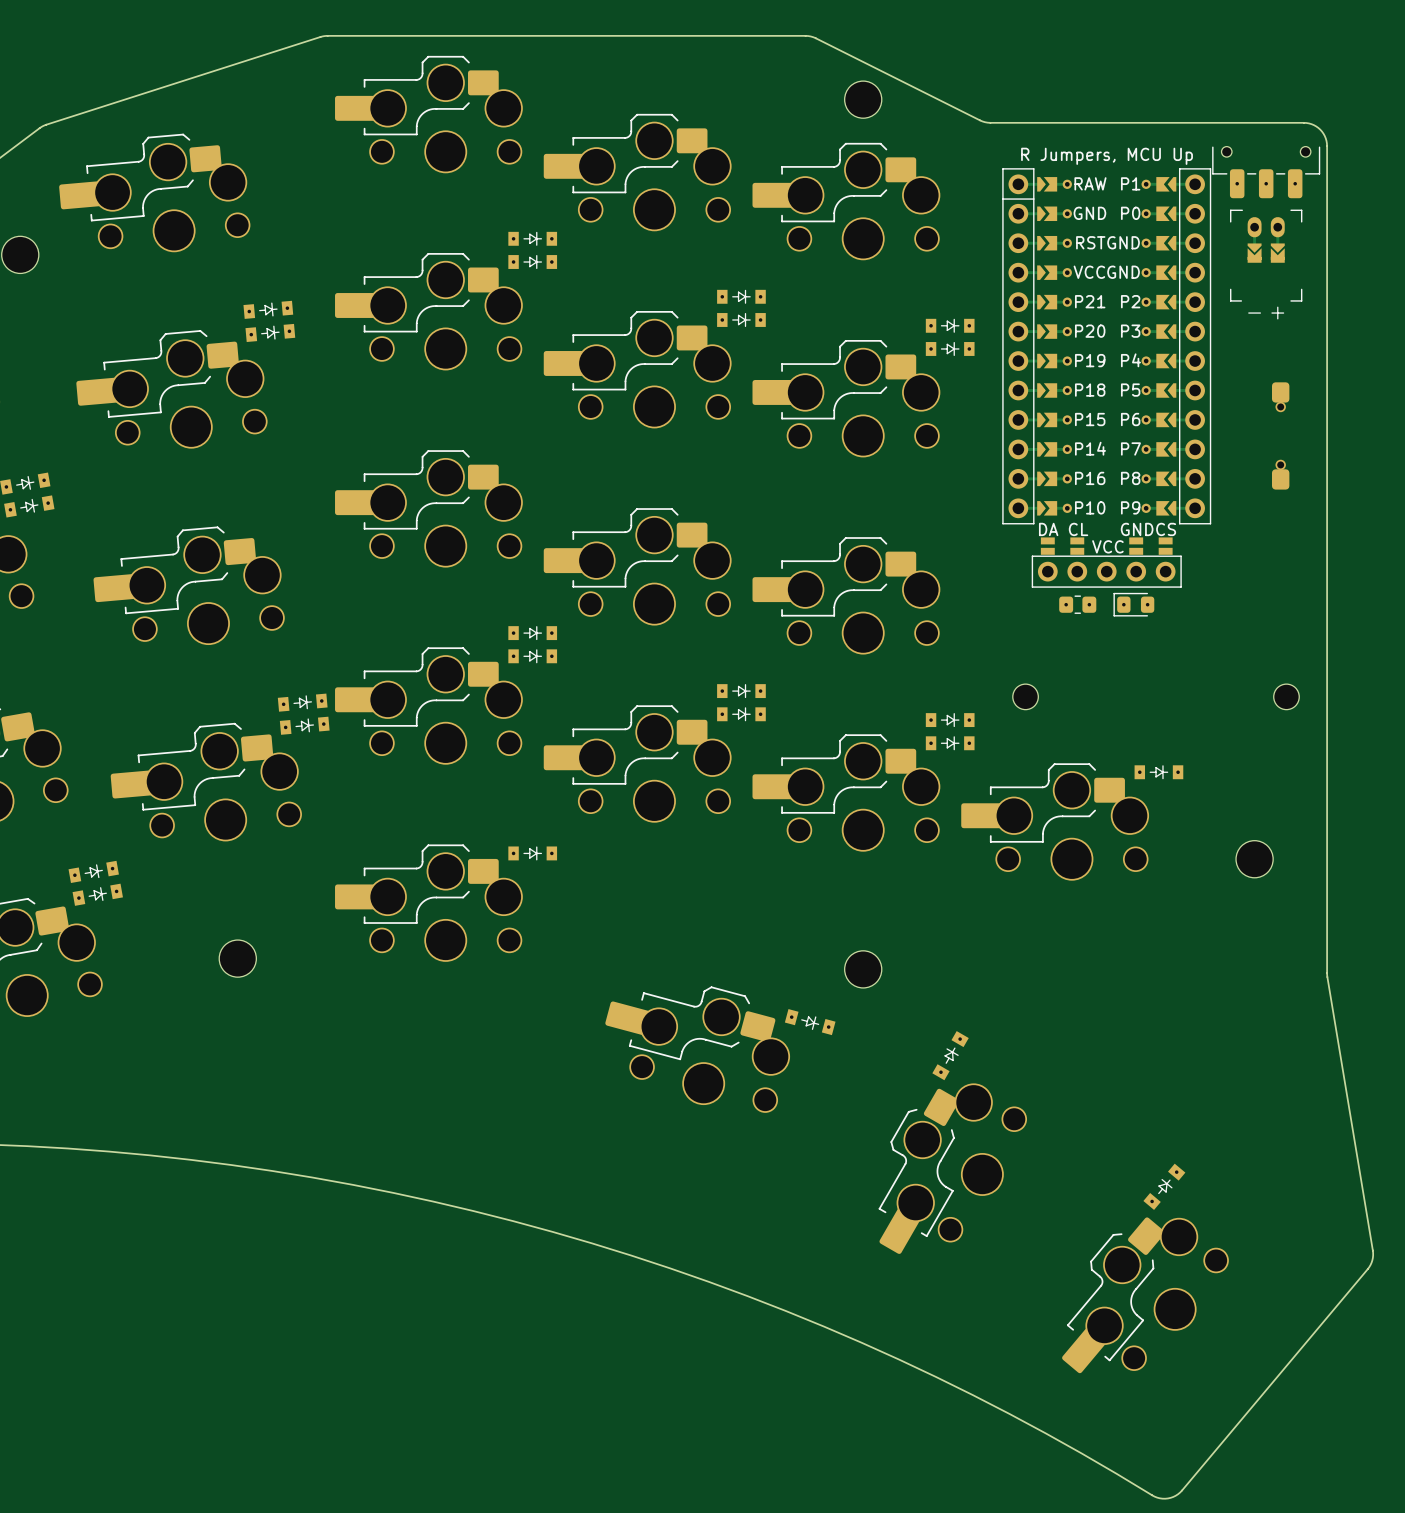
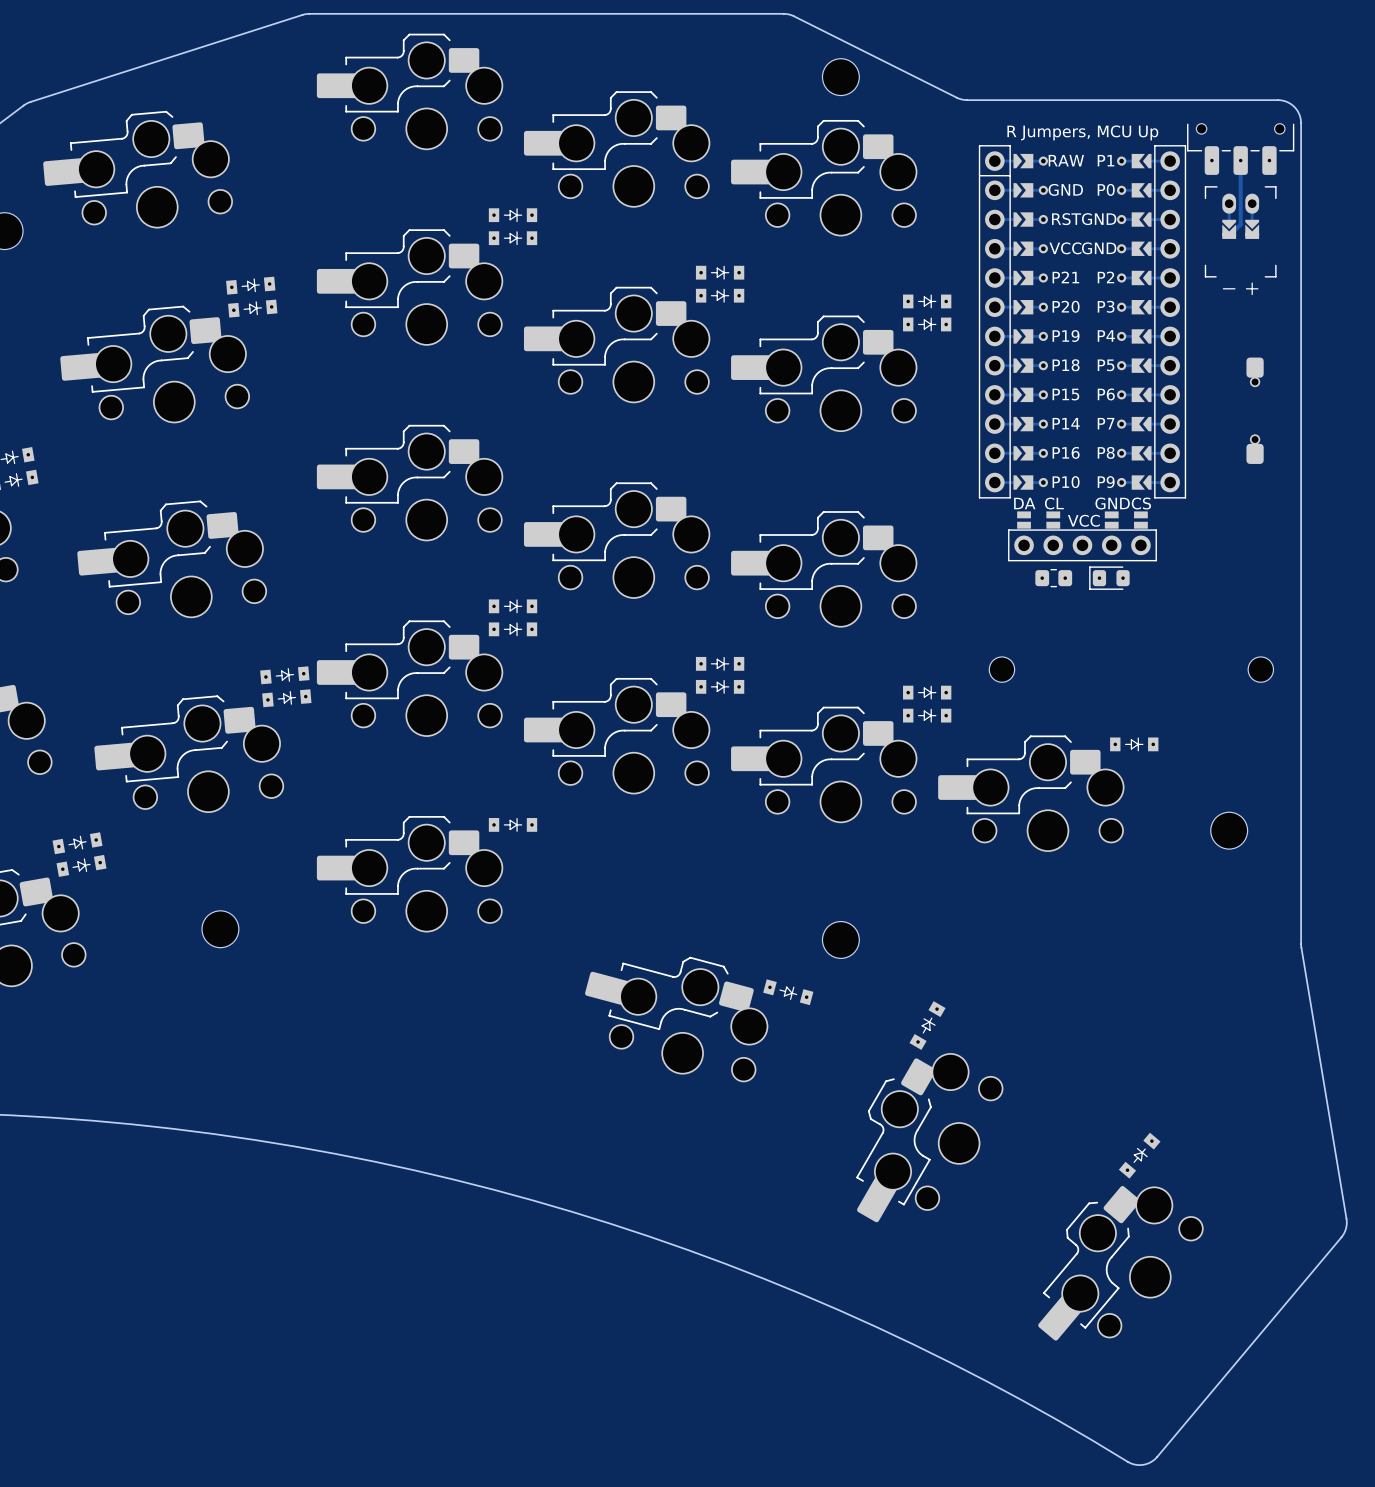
track: none -> (1240, 160) (1240, 224) (1229, 236)

